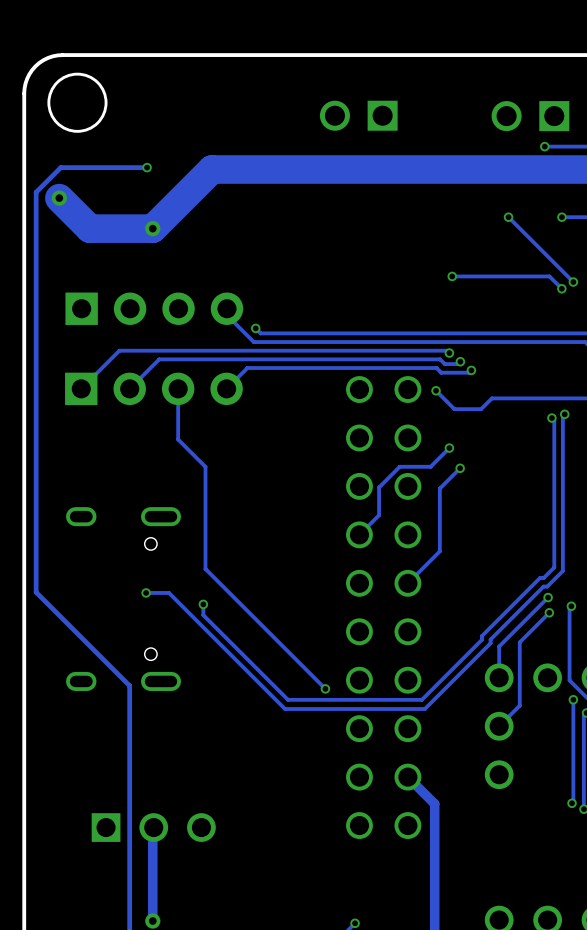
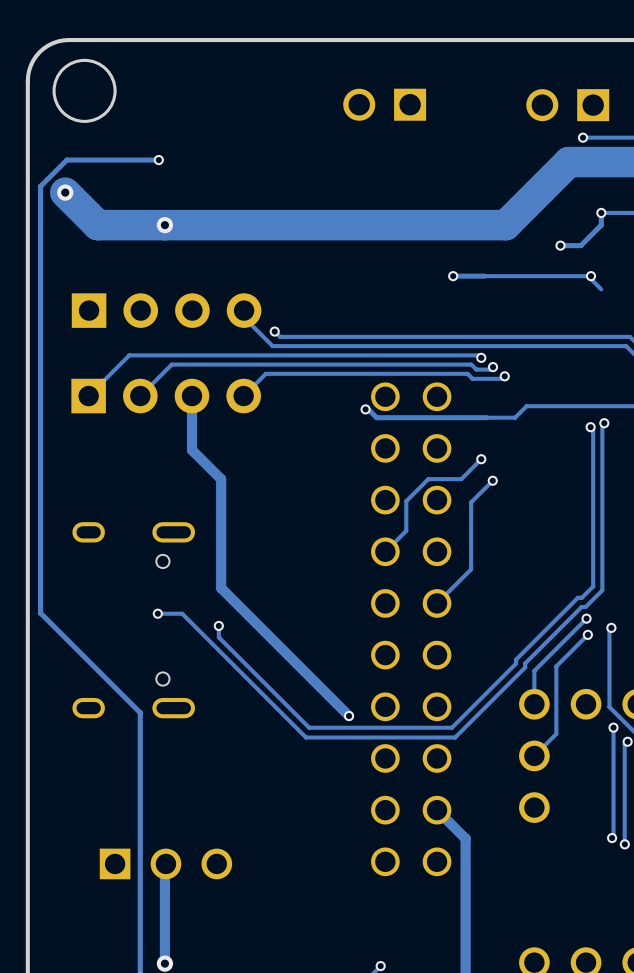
track: (531, 169) (211, 169) (152, 228) -> (568, 162) (505, 225) (164, 225)
track: (508, 217) (573, 282) -> none
via: (508, 217) -> none
track: none -> (601, 212) (601, 225) (580, 245) (560, 245)
via: none -> (560, 245)
track: none -> (484, 276) (453, 276)
via position: (452, 276) -> (453, 276)
via: none -> (591, 276)
via: (573, 282) -> none
via: (561, 288) -> none
track width: thin (178, 388) (178, 439) (205, 466) (205, 568) (325, 688) -> thick (192, 396) (192, 450) (221, 479) (221, 588) (349, 716)
track: (436, 390) (454, 409) -> (365, 409) (366, 408) (376, 417) (486, 417)
via: (436, 390) -> none
via: none -> (365, 409)

